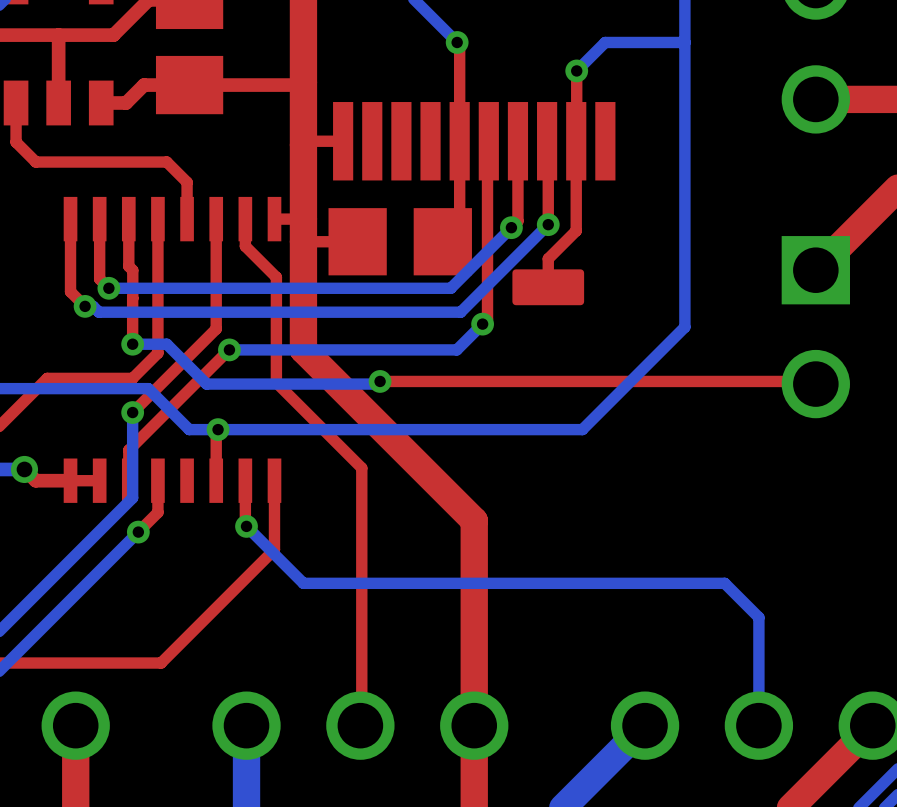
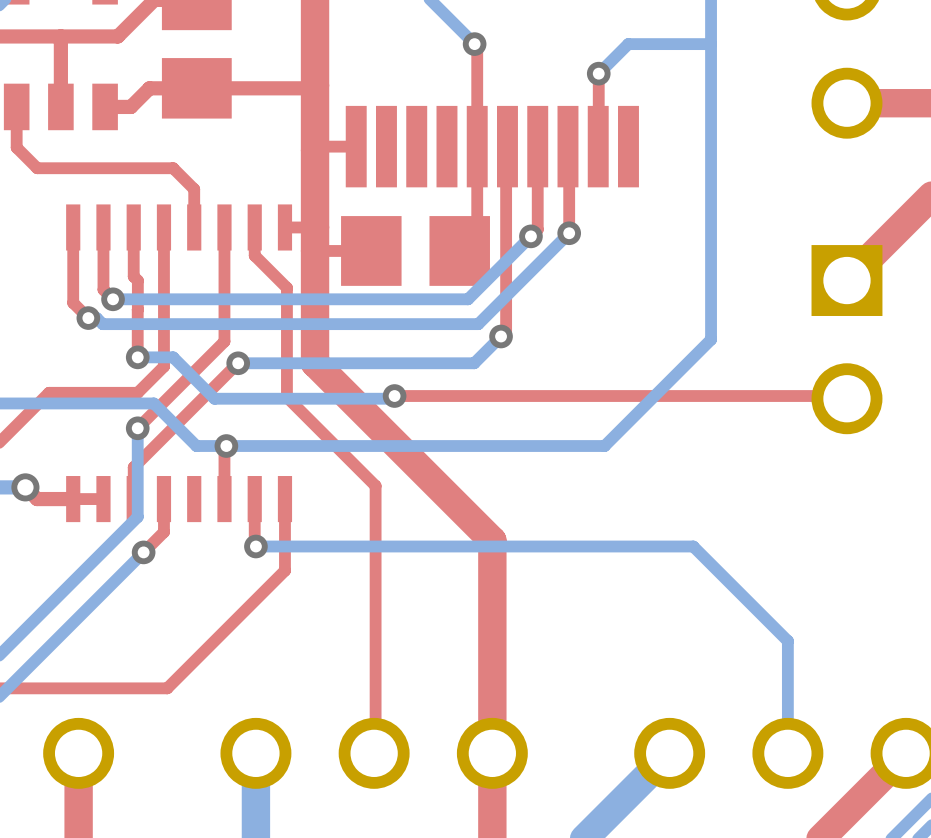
top track: (576, 141) (576, 230) (548, 258) (548, 287) -> none
part: (548, 287) -> none
bottom track: (246, 526) (303, 583) (724, 583) -> (255, 546) (693, 546) (752, 605)

